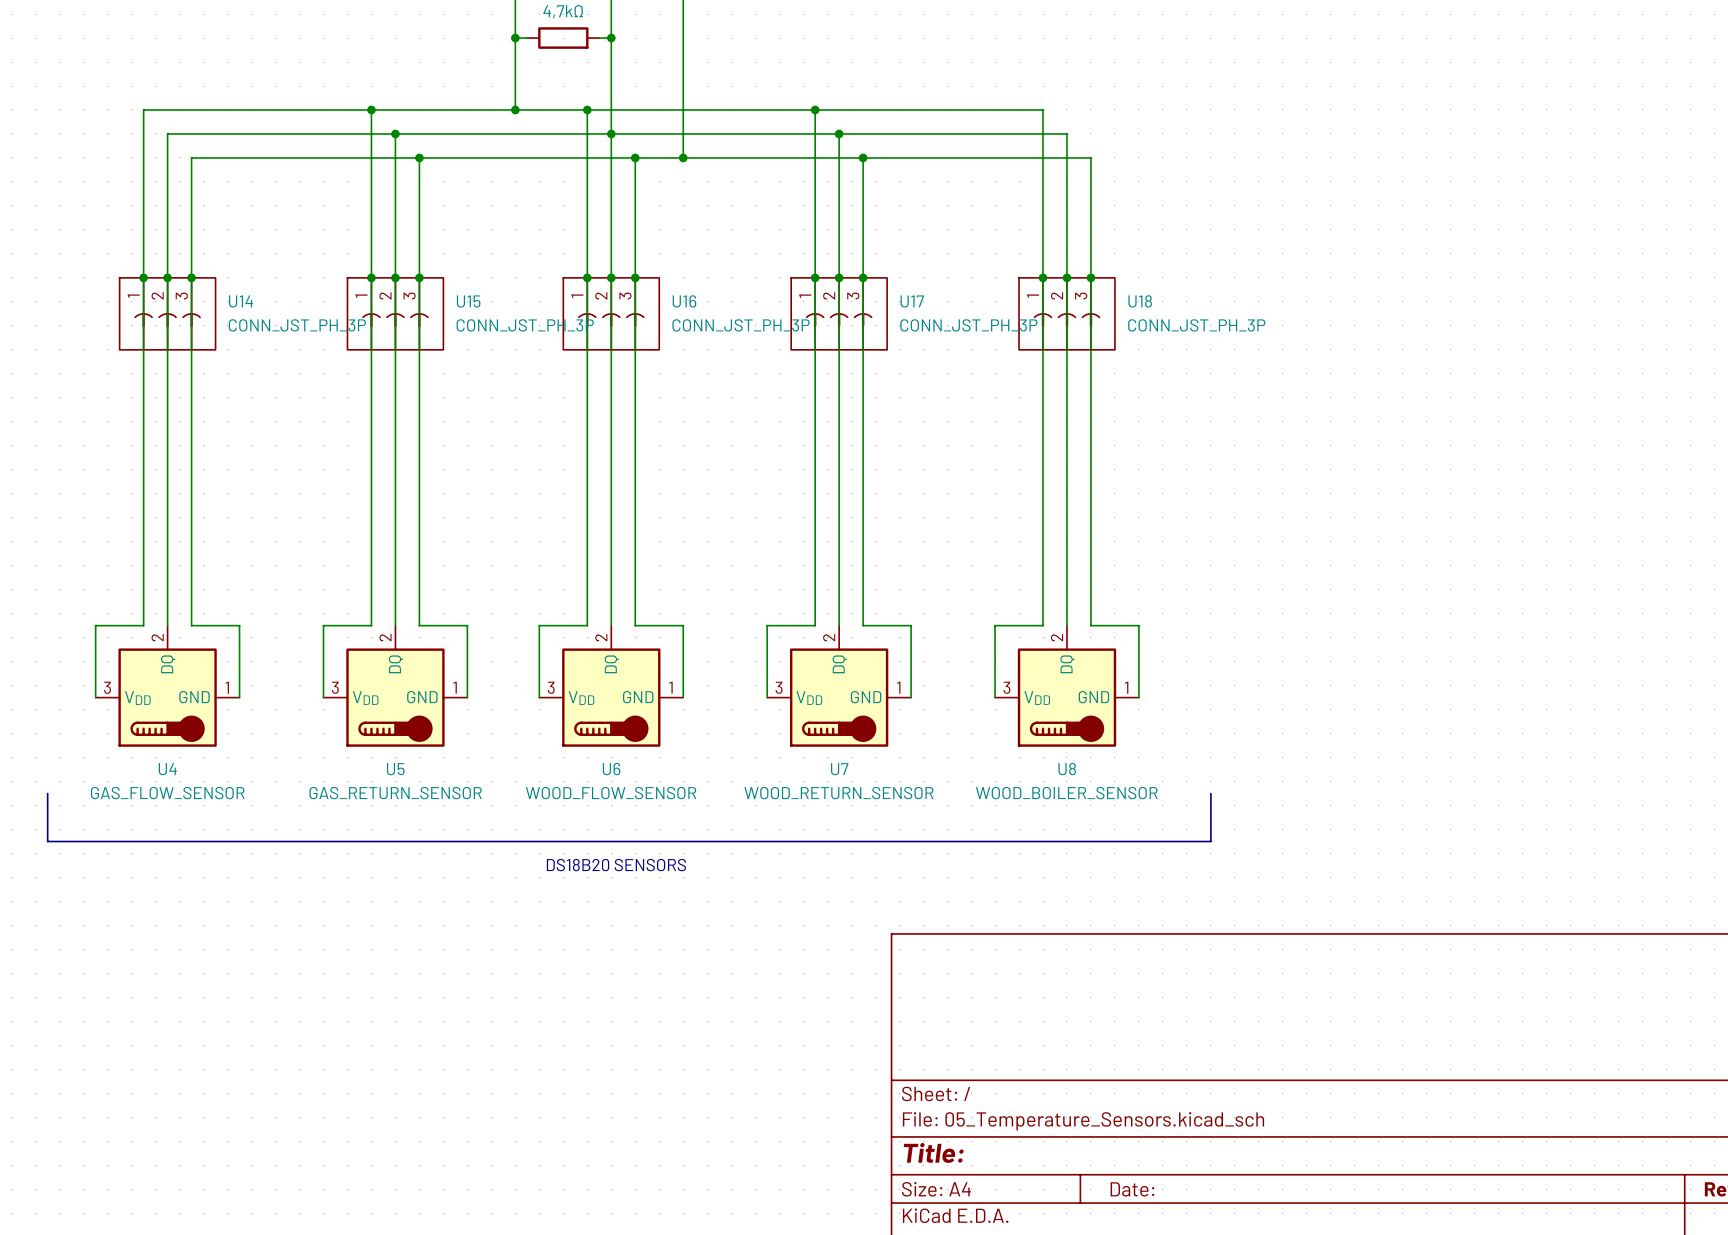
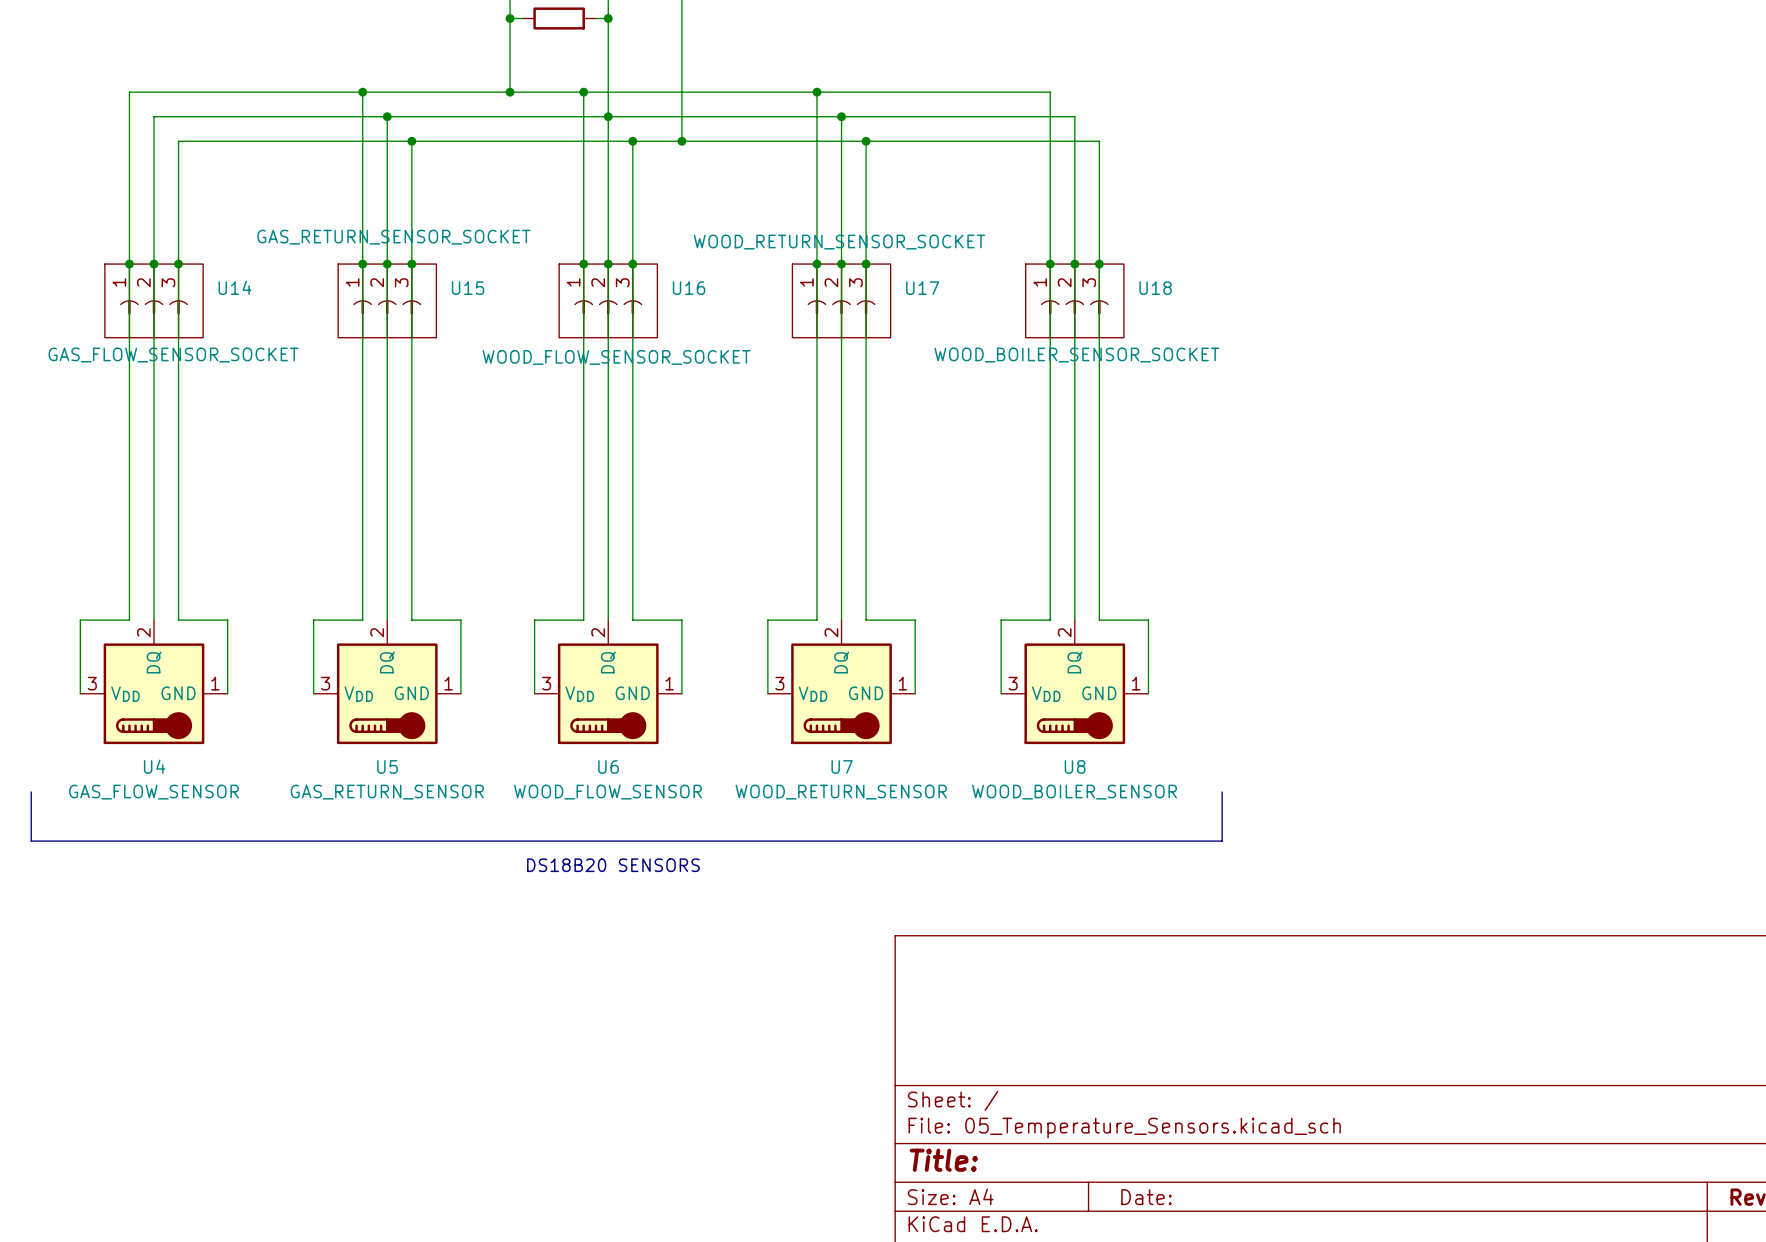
U14 value: CONN_JST_PH_3P (297, 325) -> GAS_FLOW_SENSOR_SOCKET (173, 355)
U15 value: CONN_JST_PH_3P (525, 325) -> GAS_RETURN_SENSOR_SOCKET (393, 237)
U16 value: CONN_JST_PH_3P (741, 325) -> WOOD_FLOW_SENSOR_SOCKET (616, 357)
U17 value: CONN_JST_PH_3P (968, 325) -> WOOD_RETURN_SENSOR_SOCKET (839, 242)
U18 value: CONN_JST_PH_3P (1196, 325) -> WOOD_BOILER_SENSOR_SOCKET (1076, 355)

